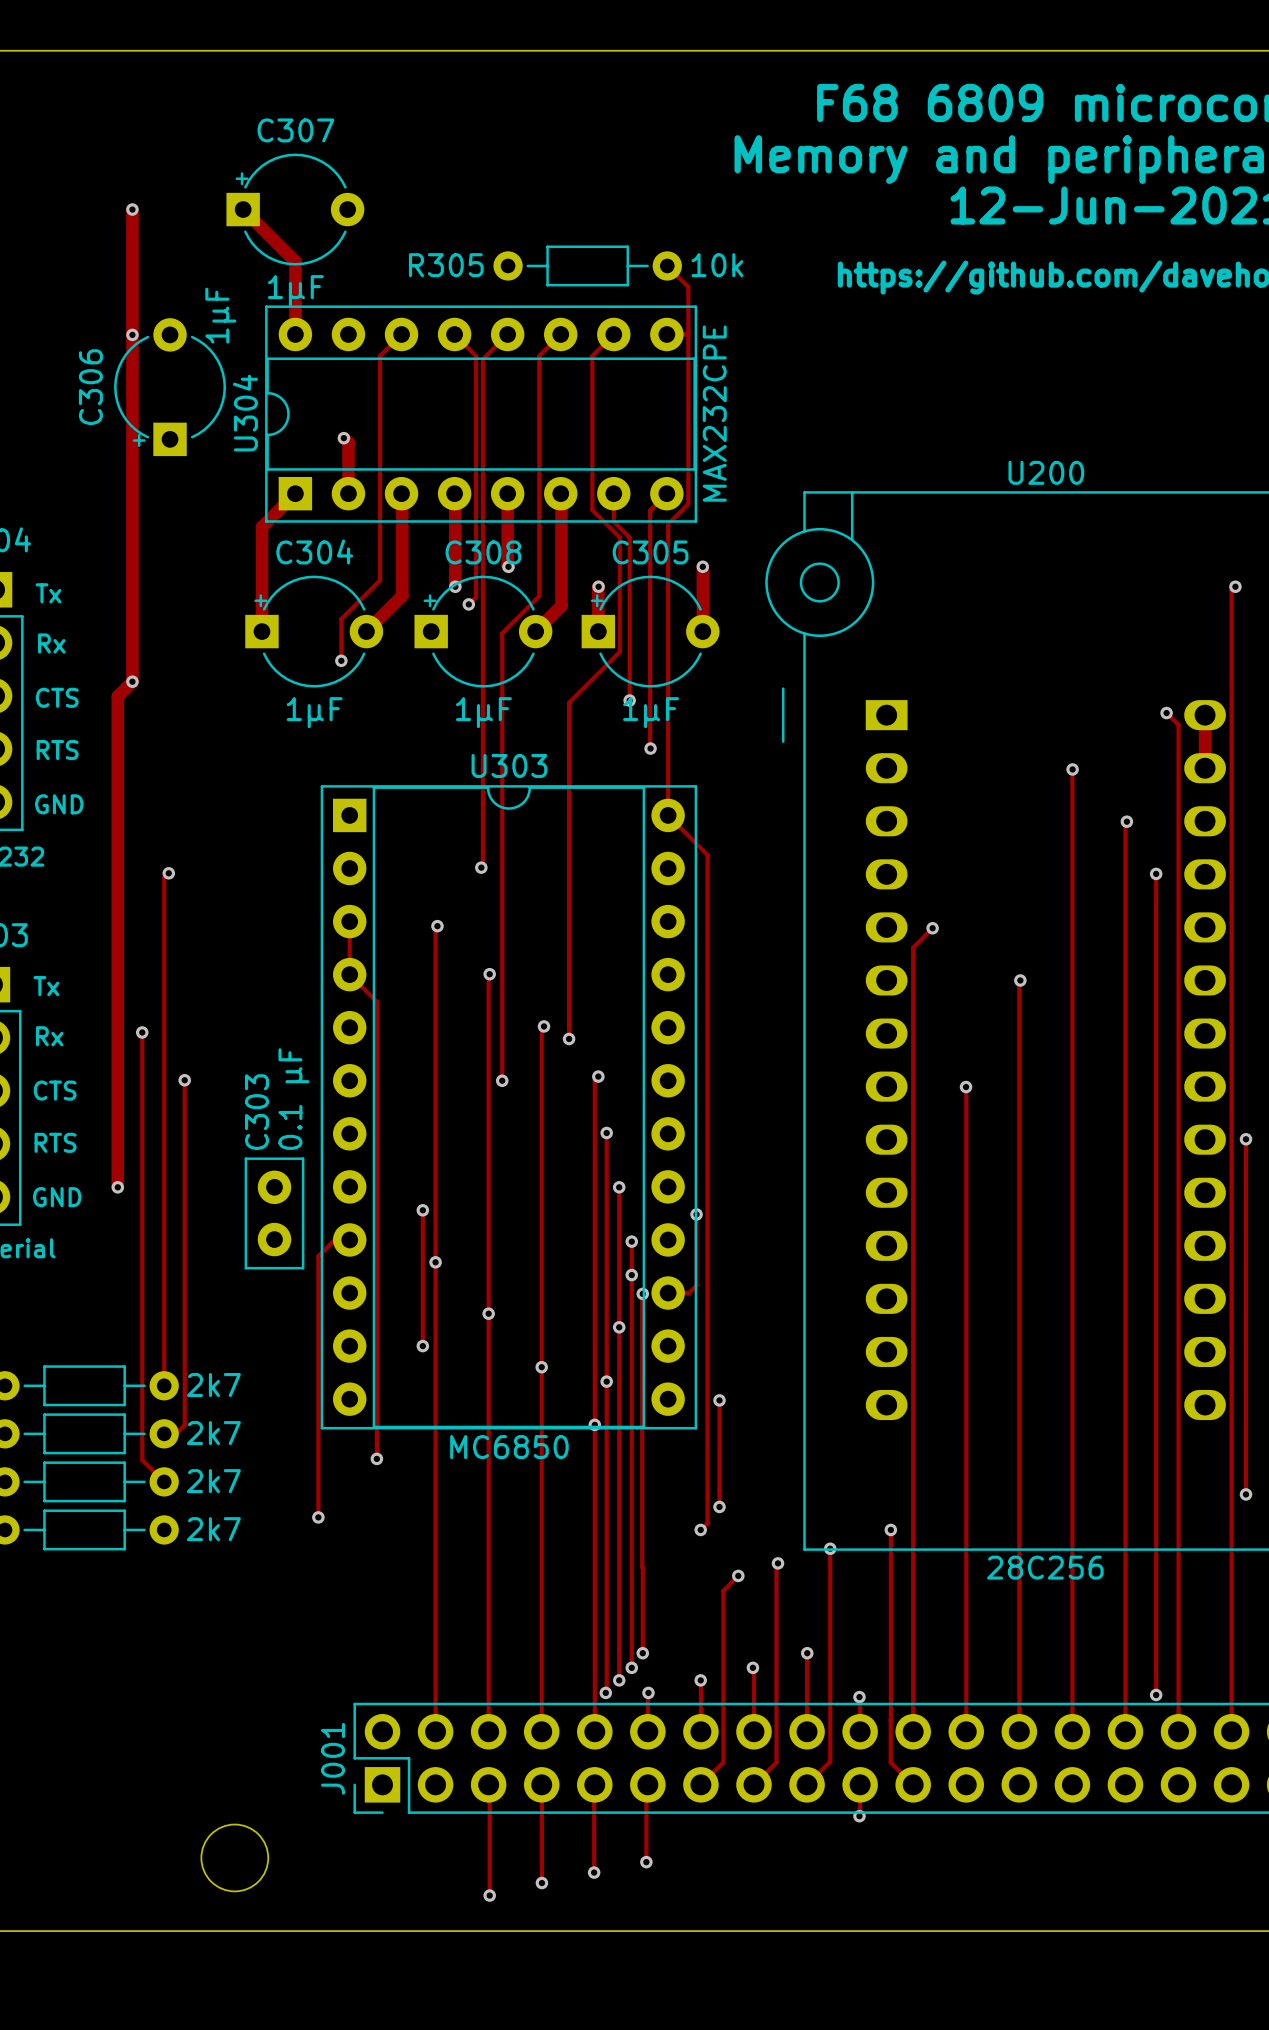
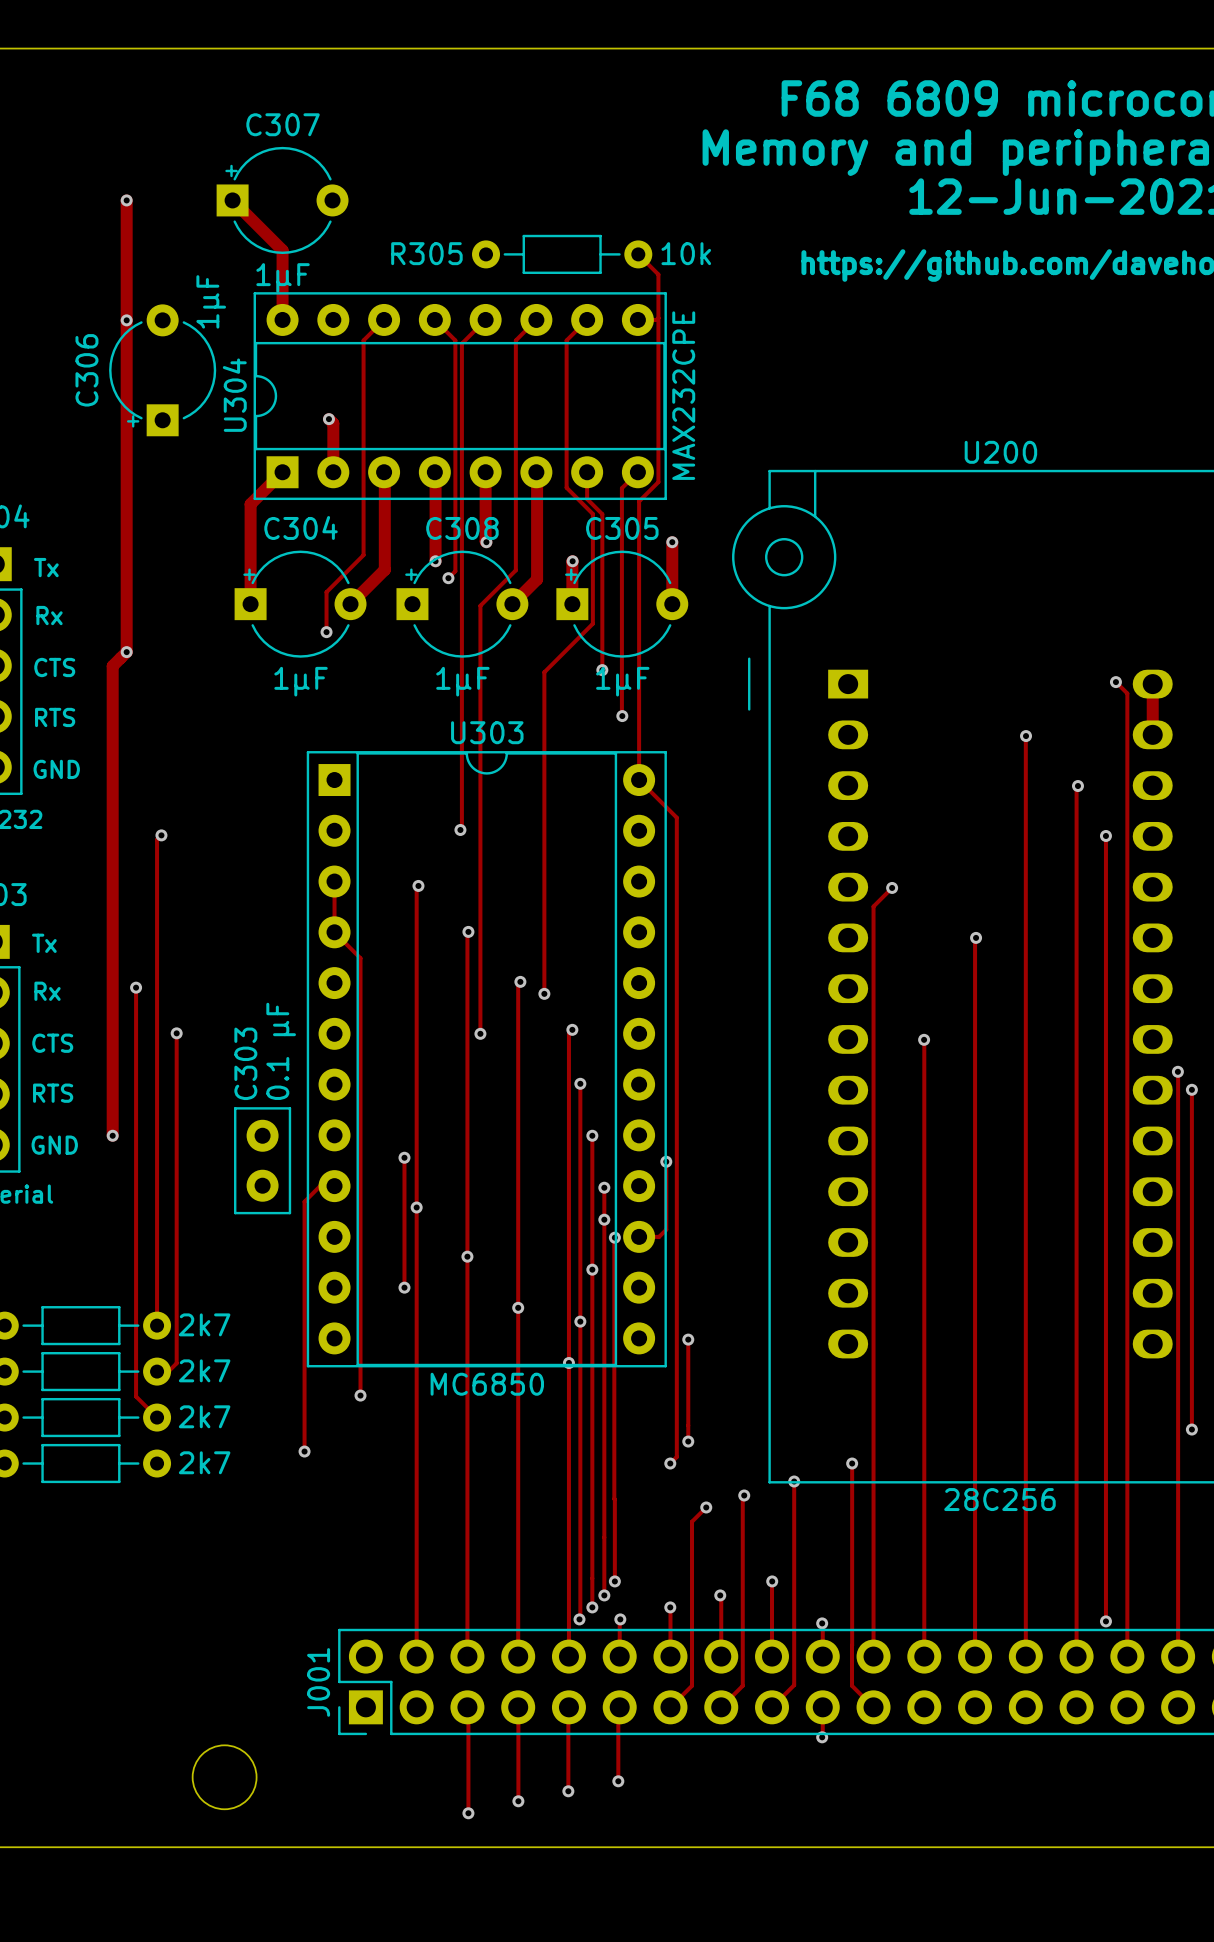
track: (1235, 586) (1231, 590) (1231, 1120) -> none
via: (1235, 586) -> none
via: none -> (1177, 1071)

